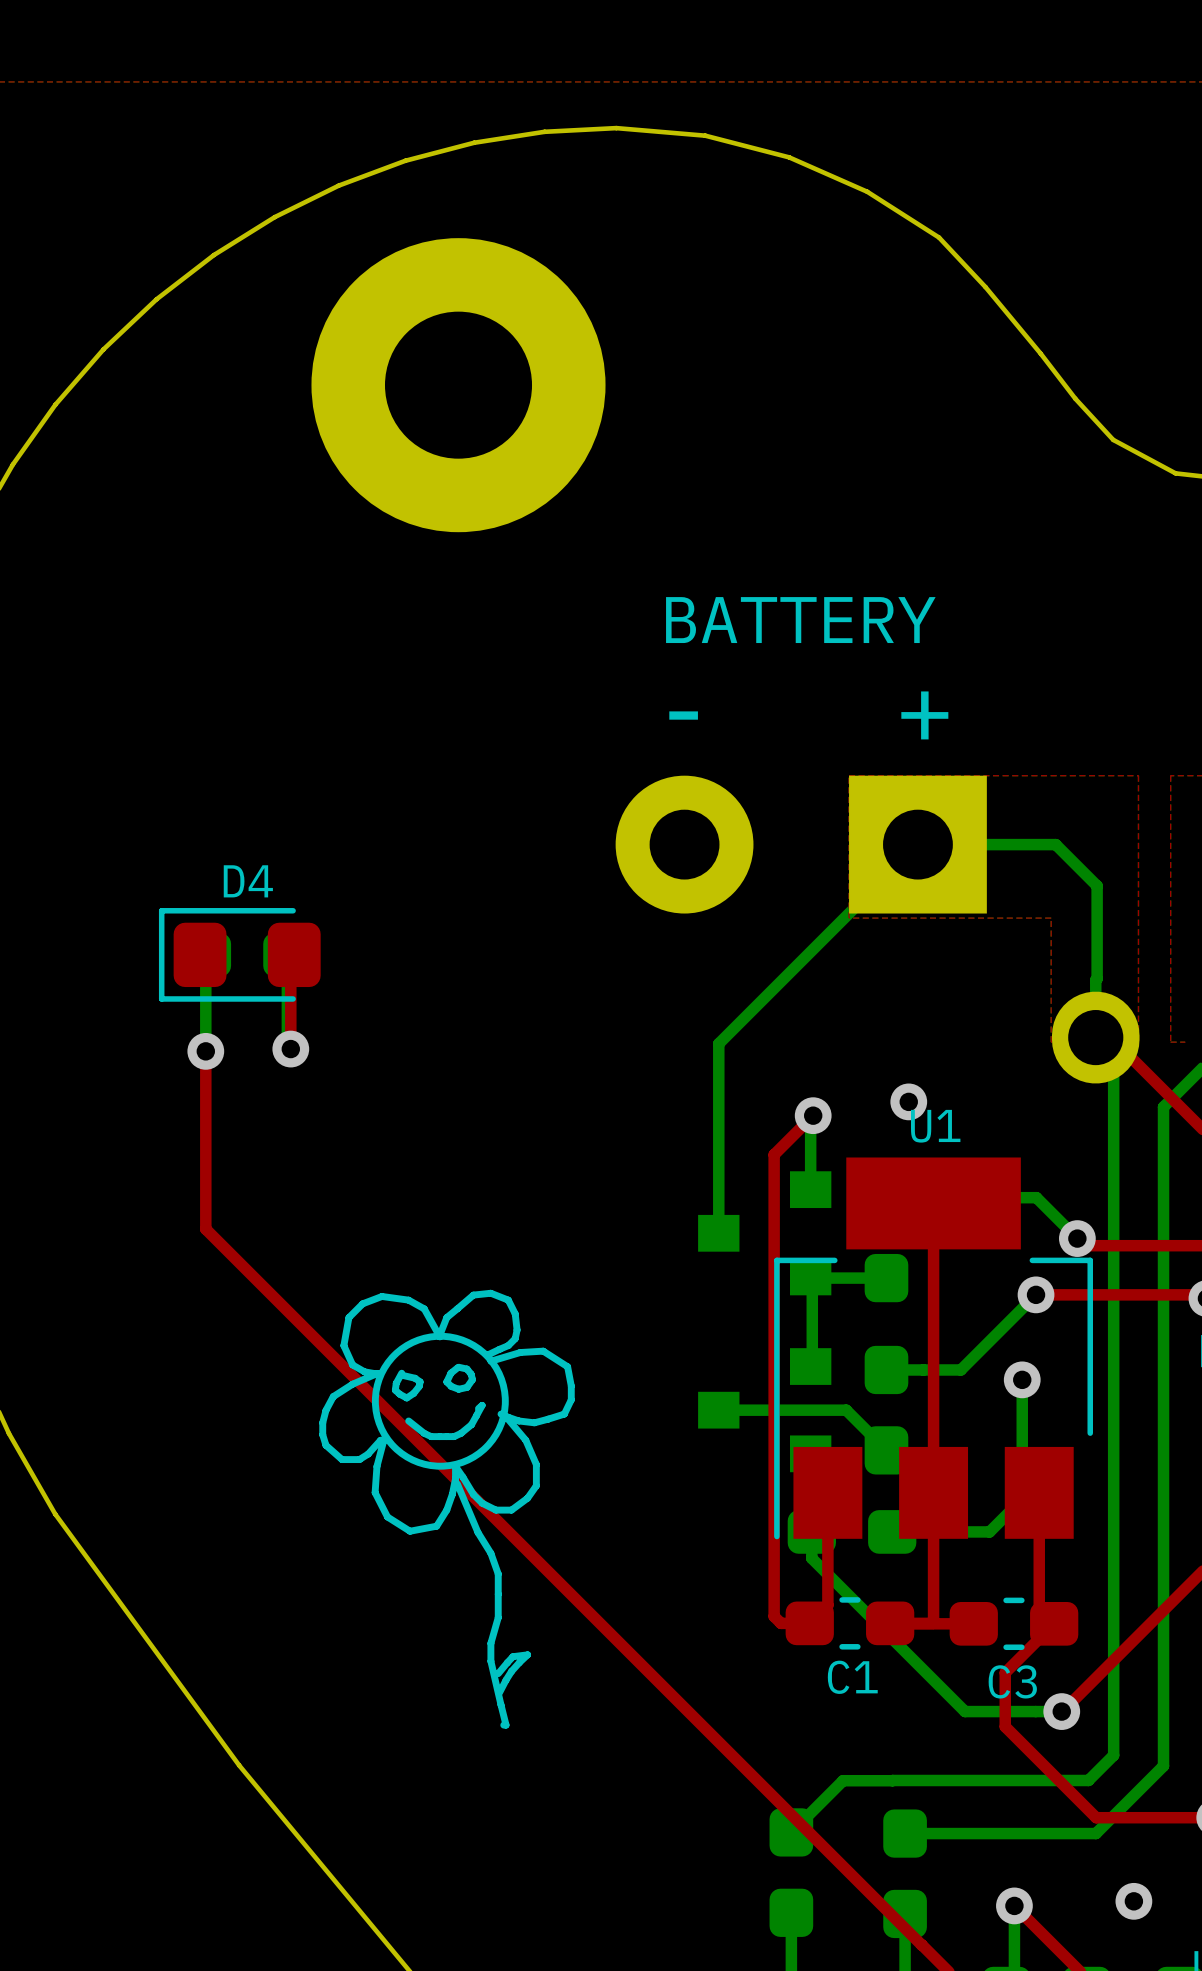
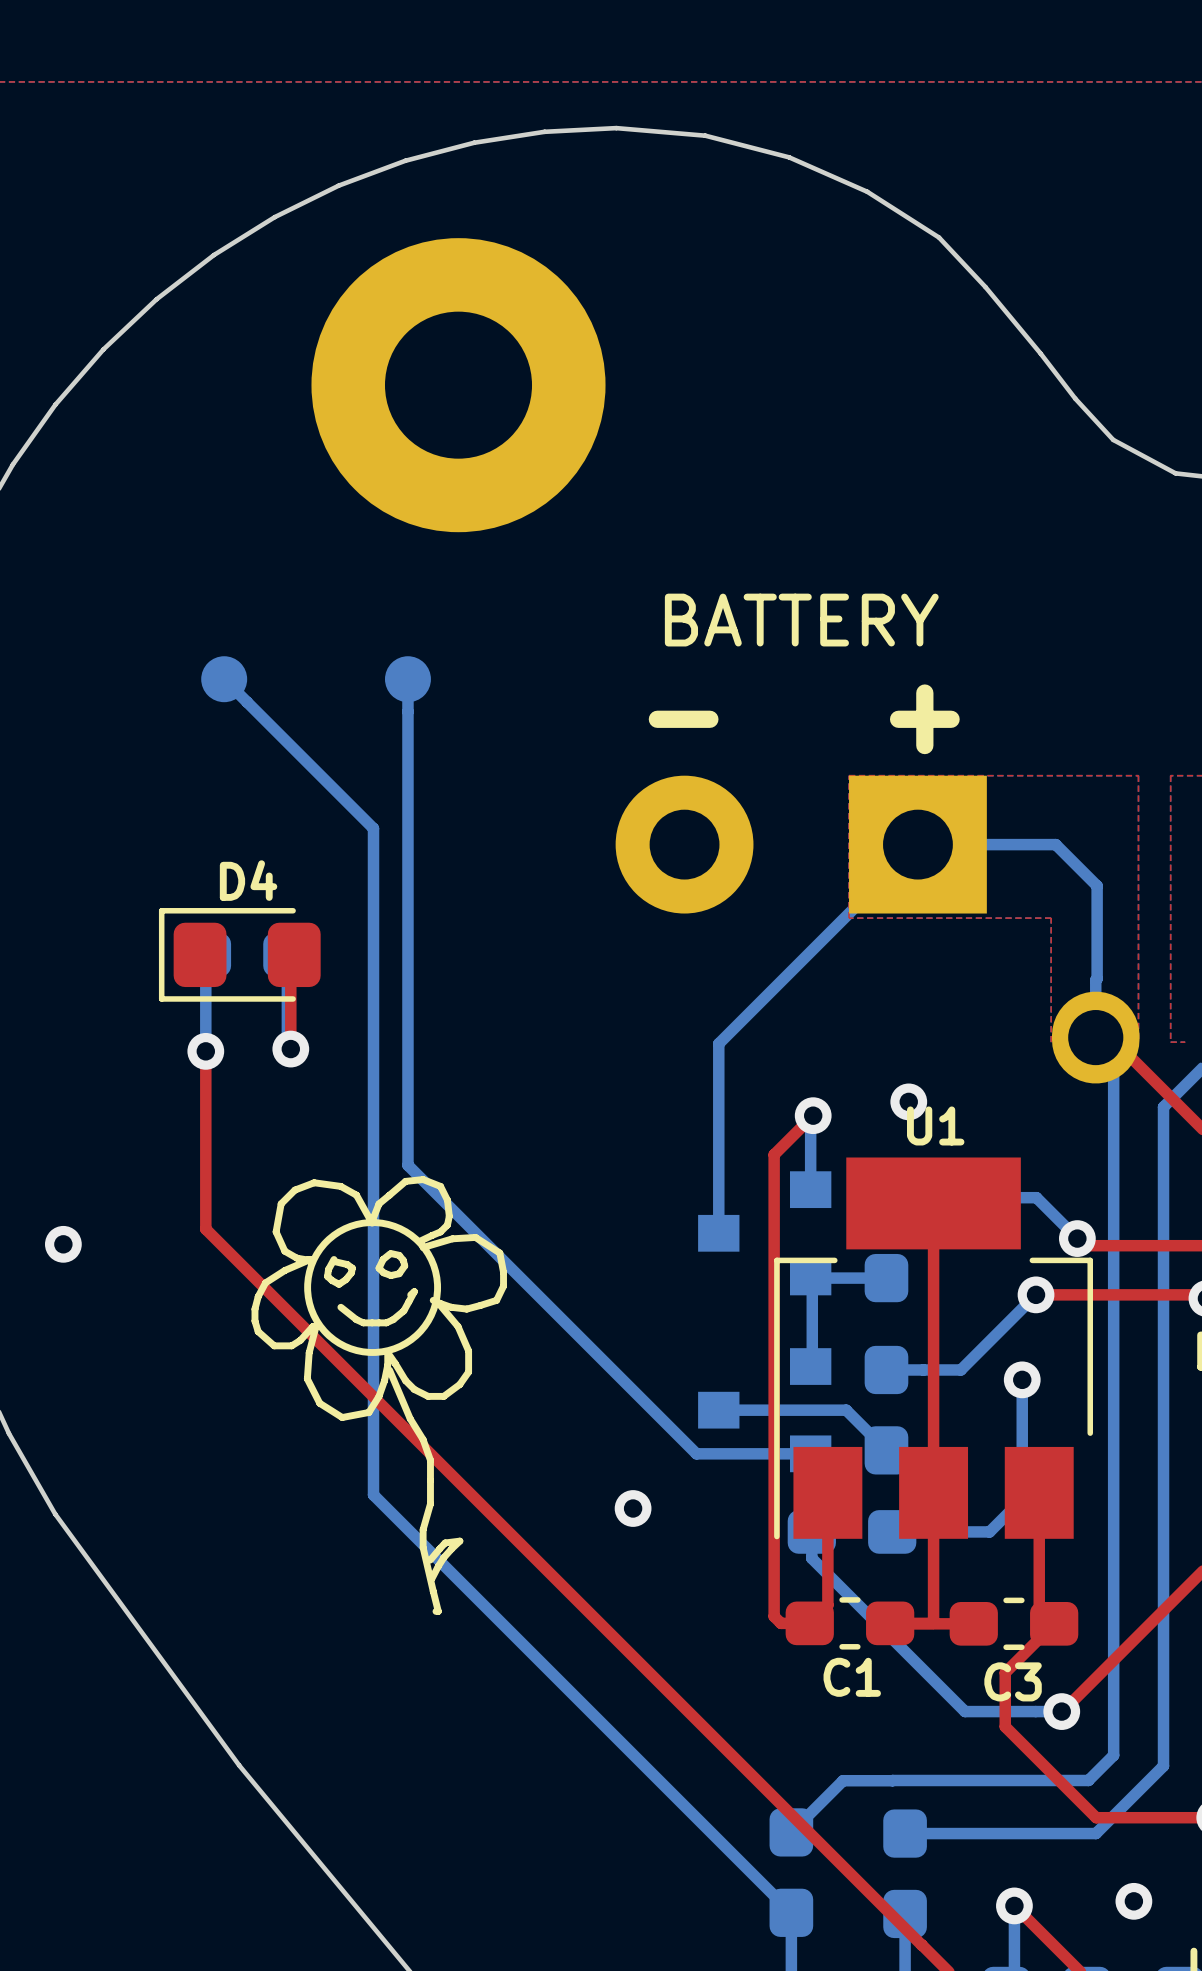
bottom track: none -> (224, 679) (373, 828) (373, 1494) (791, 1912)
part: none -> (224, 679)
bottom track: none -> (407, 679) (407, 1165) (696, 1453) (810, 1453)
part: none -> (407, 679)
via: none -> (63, 1244)
via: none -> (633, 1508)
drawing position: (447, 1509) -> (379, 1395)

